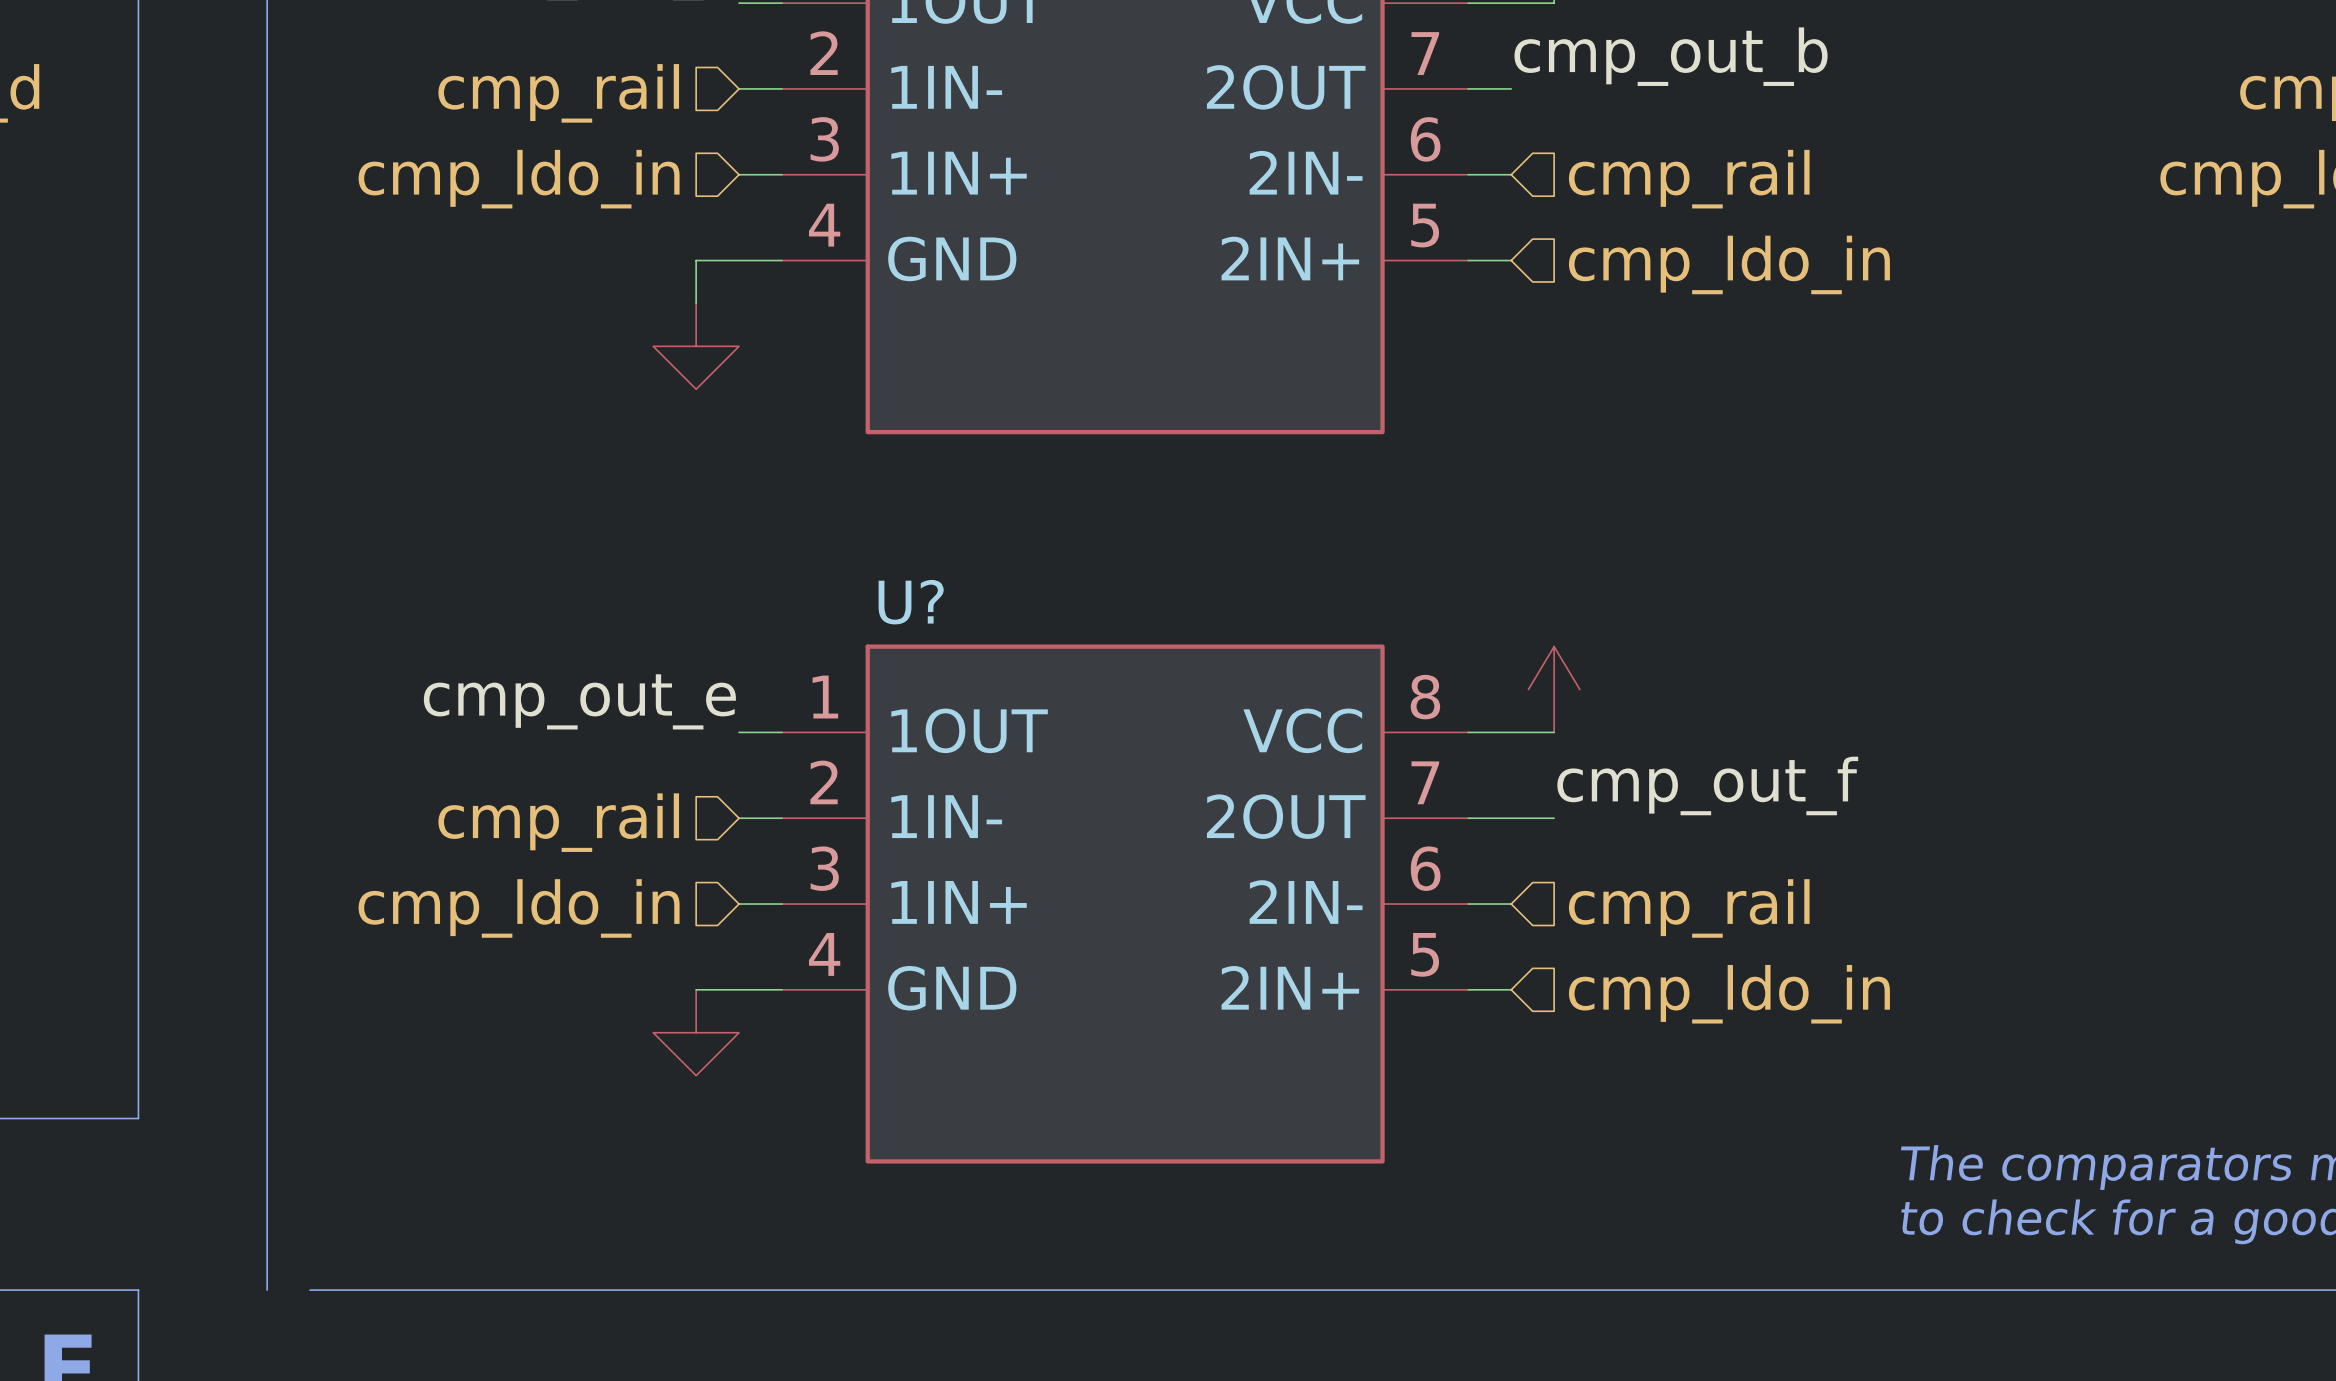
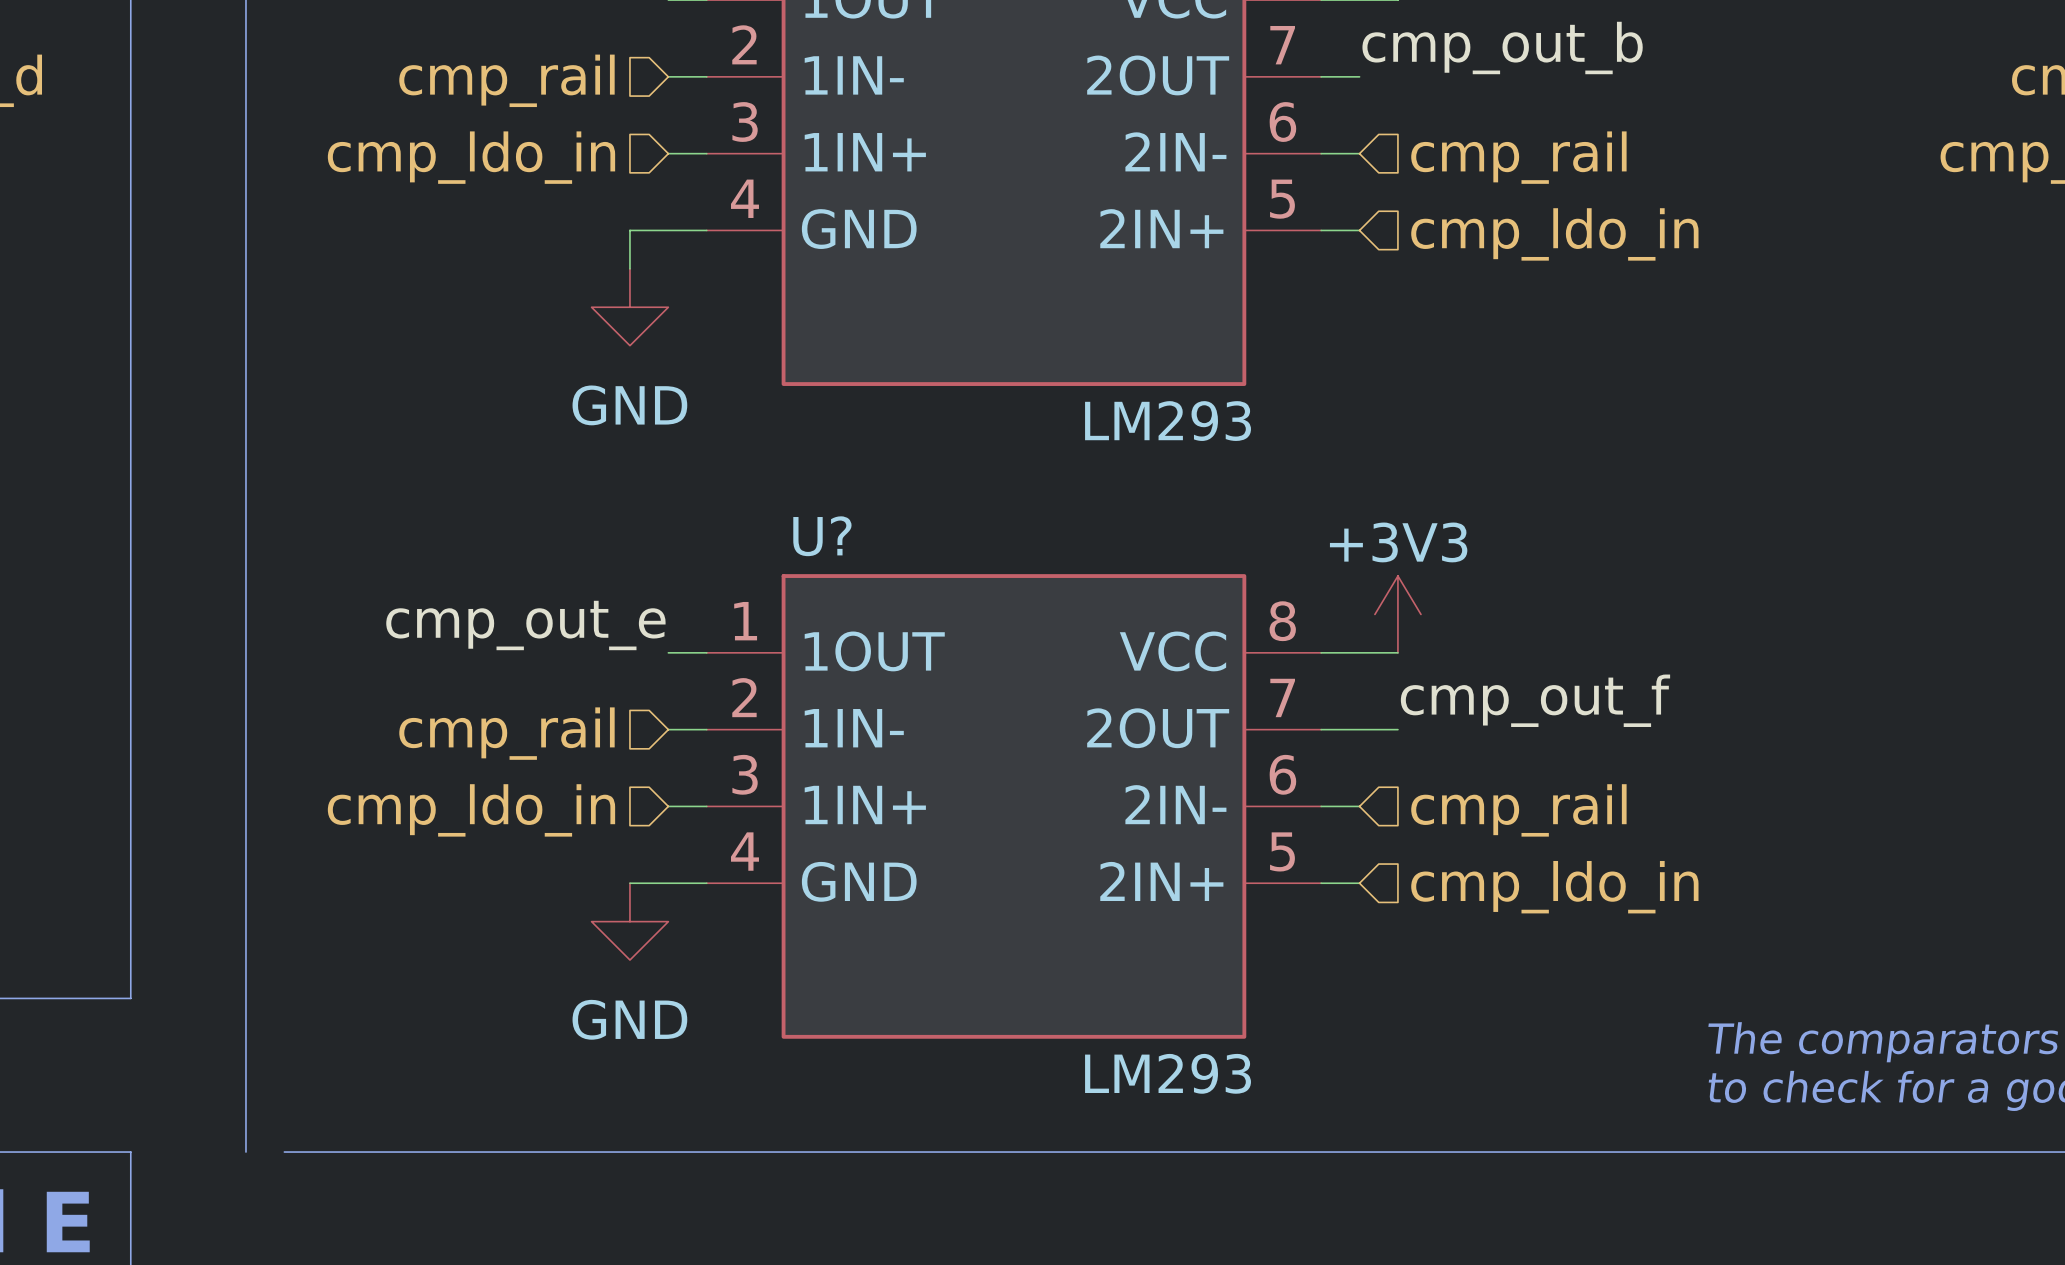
power symbol text: none -> GND (629, 405)
part value: none -> LM293 (1168, 421)
power symbol text: none -> +3V3 (1398, 542)
power symbol text: none -> GND (629, 1019)
U? value: none -> LM293 (1168, 1073)

